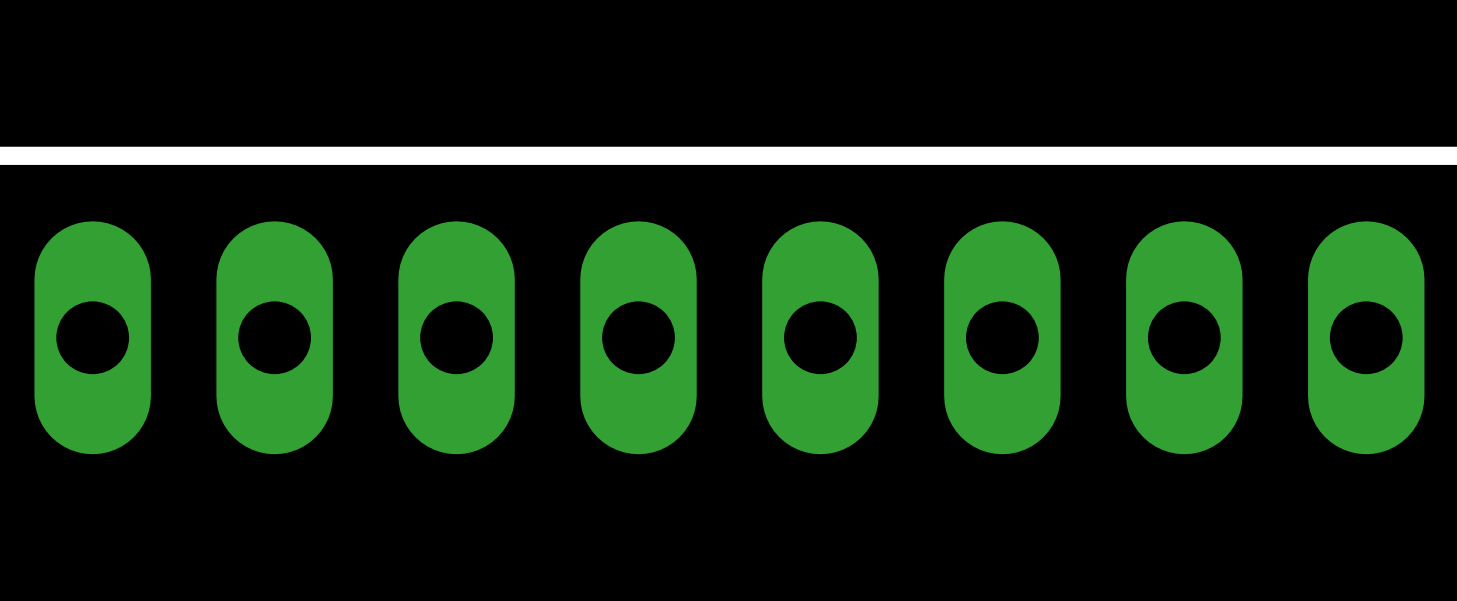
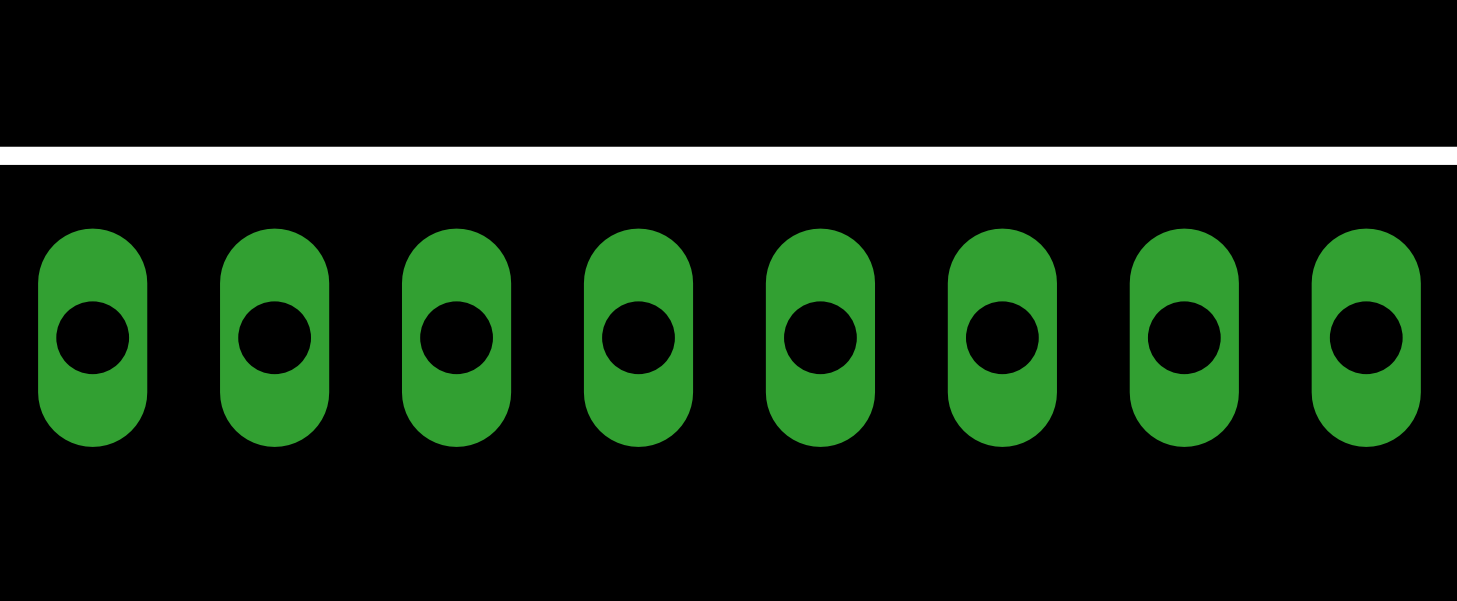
part footprint: [34, 221, 1425, 455] -> [38, 228, 1421, 447]

